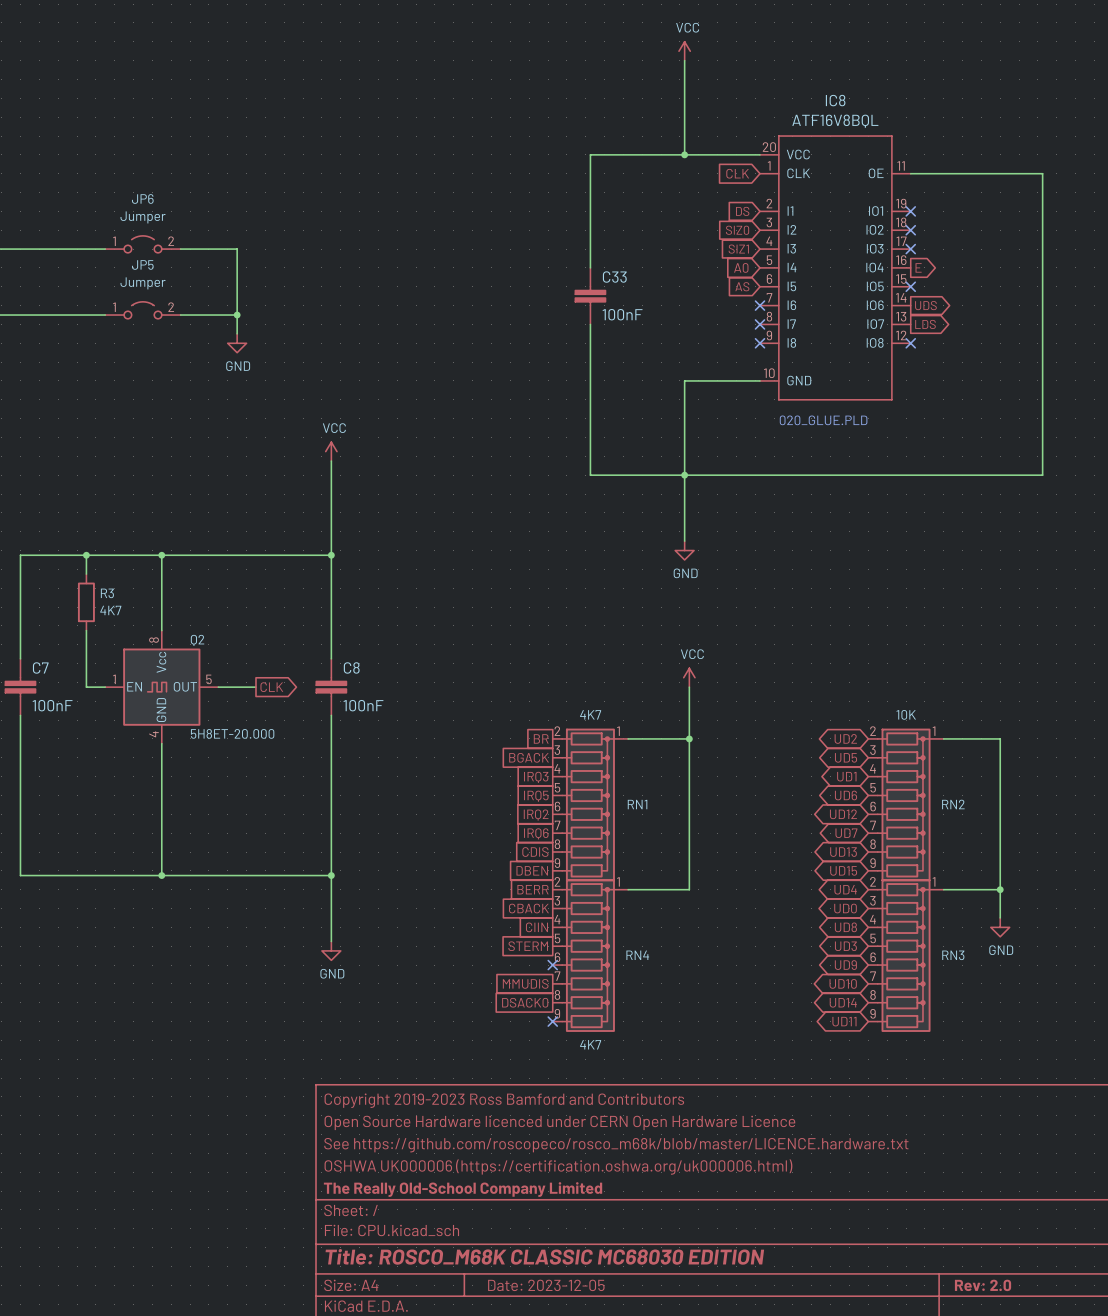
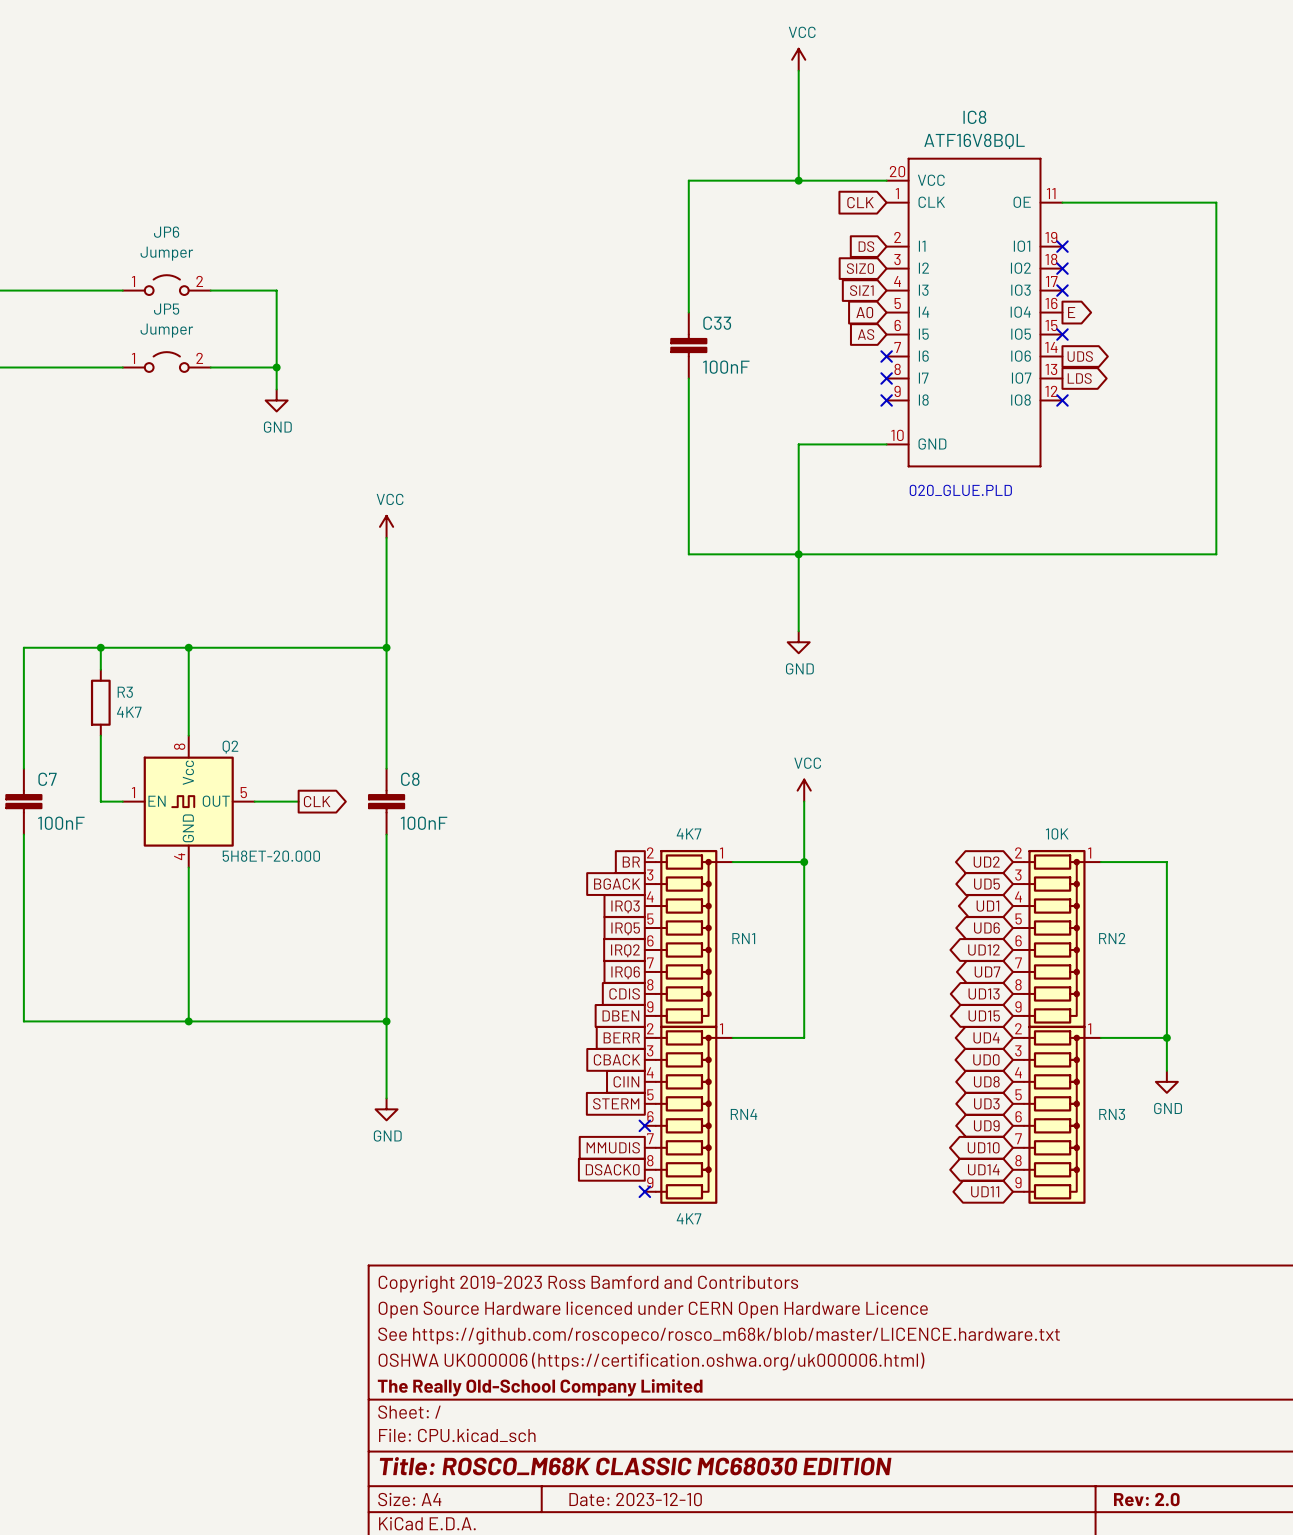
title block: Date: 2023-12-05 (546, 1285) -> Date: 2023-12-10 (635, 1499)

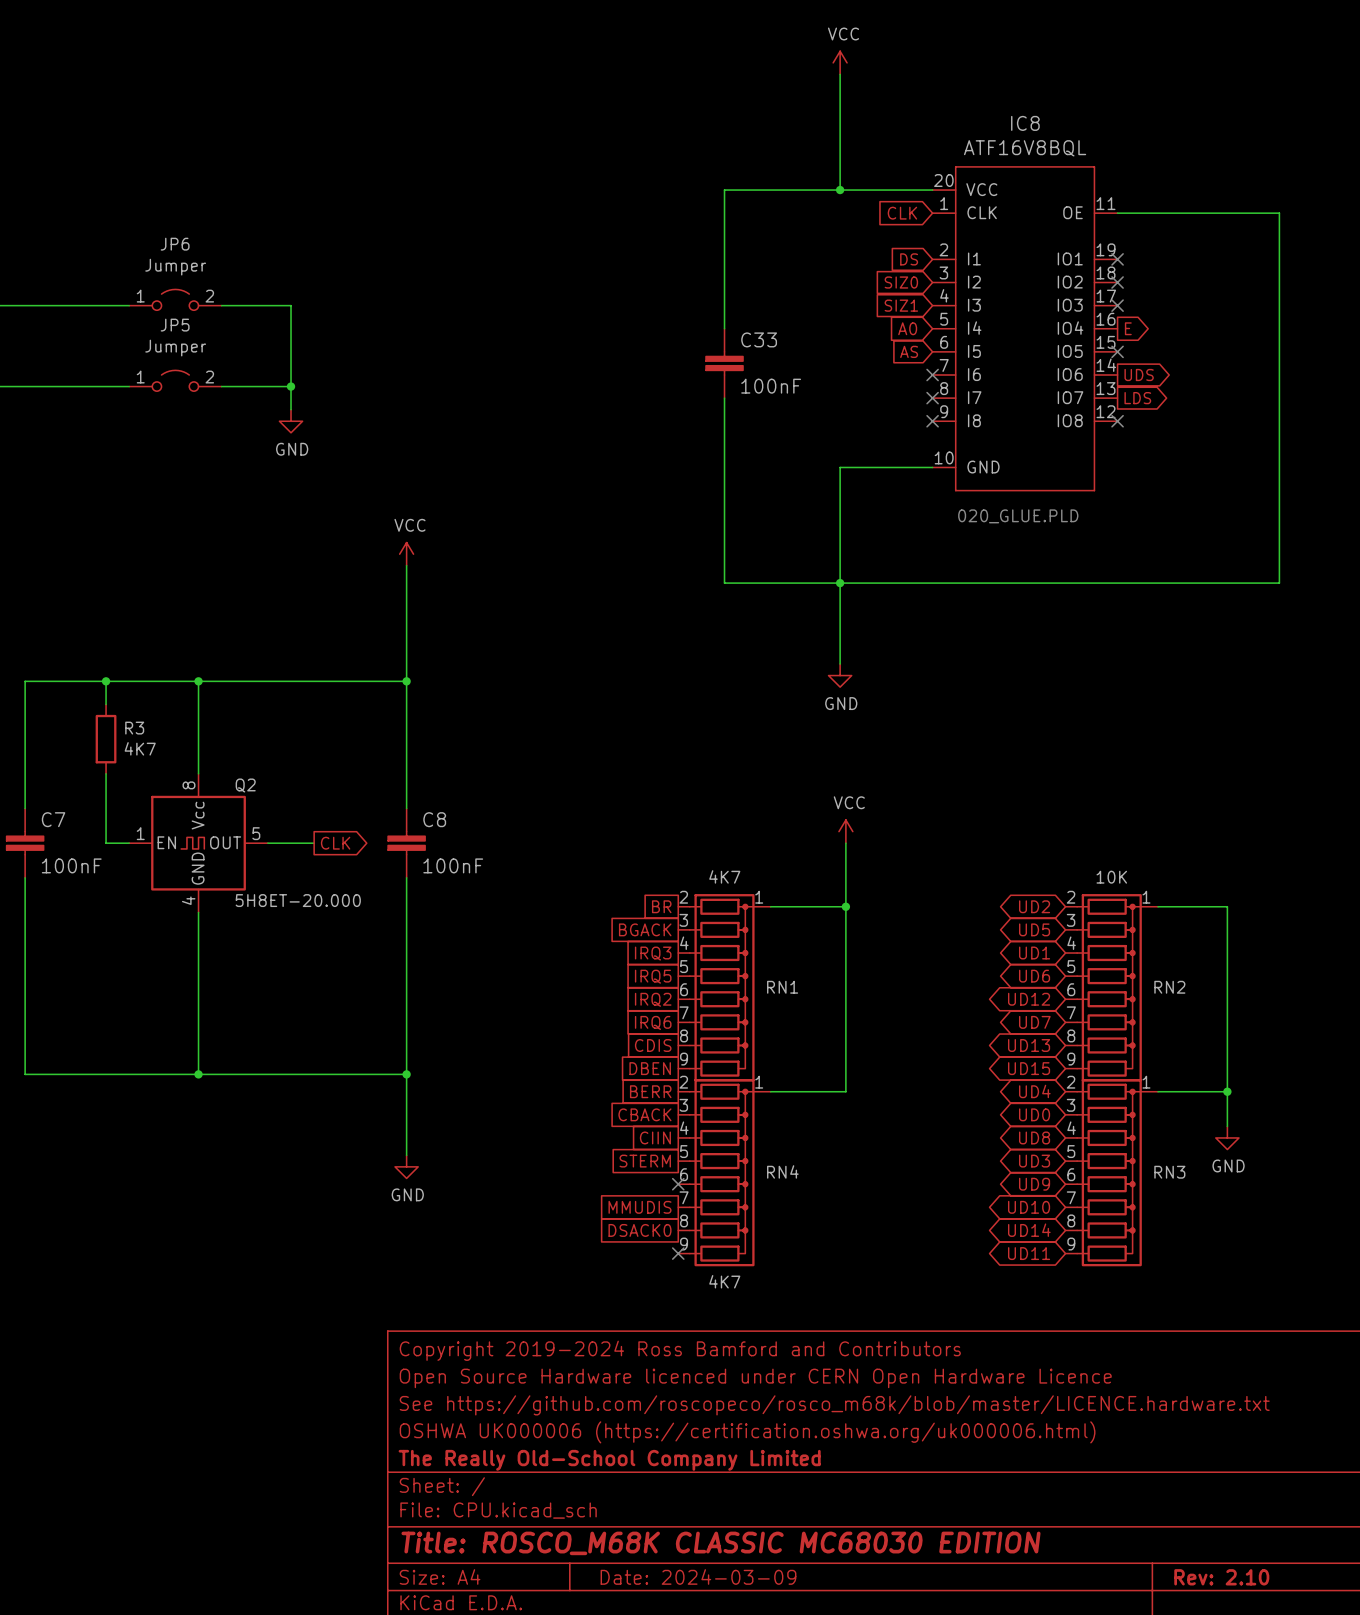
title block: Copyright 2019-2023 Ross Bamford and Contributors (588, 1284) -> Copyright 2019-2024 Ross Bamford and Contributors (680, 1350)
title block: Date: 2023-12-10 (635, 1499) -> Date: 2024-03-09 (698, 1576)
title block: Rev: 2.0 (1146, 1499) -> Rev: 2.10 (1221, 1577)

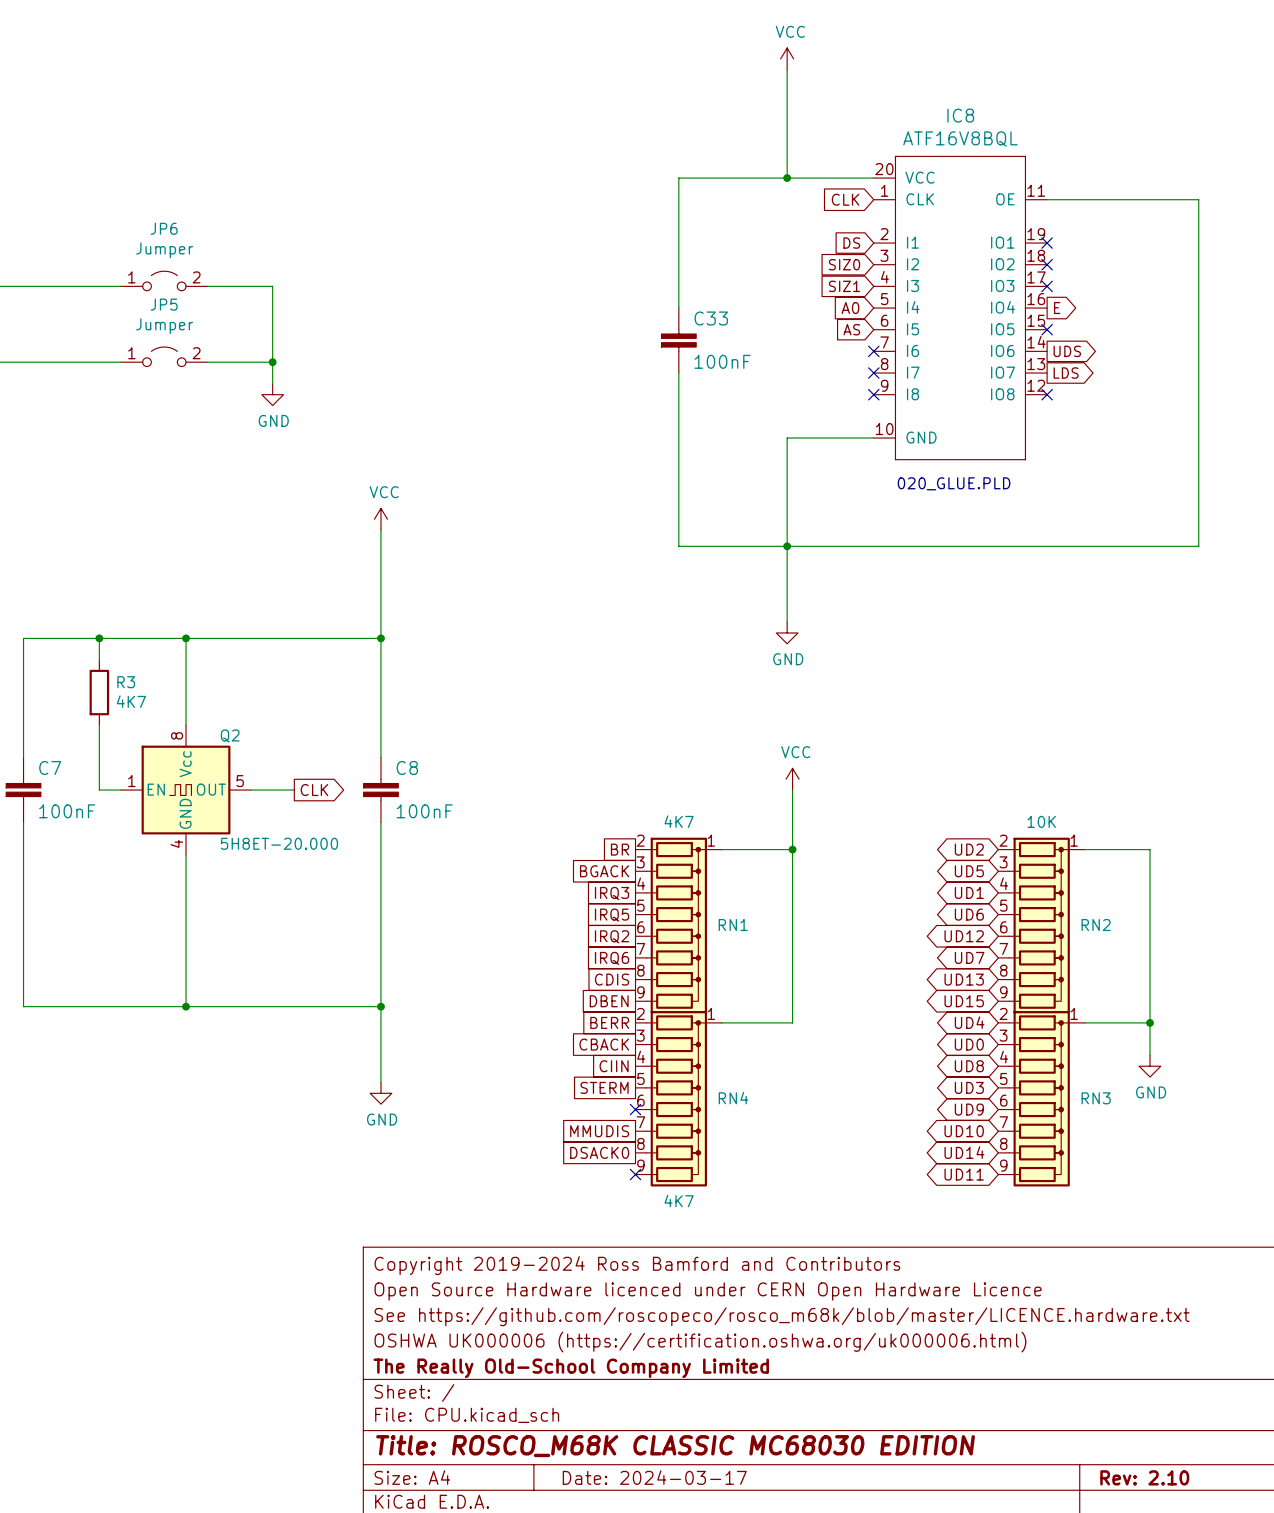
title block: Date: 2024-03-09 (698, 1576) -> Date: 2024-03-17 (654, 1477)

